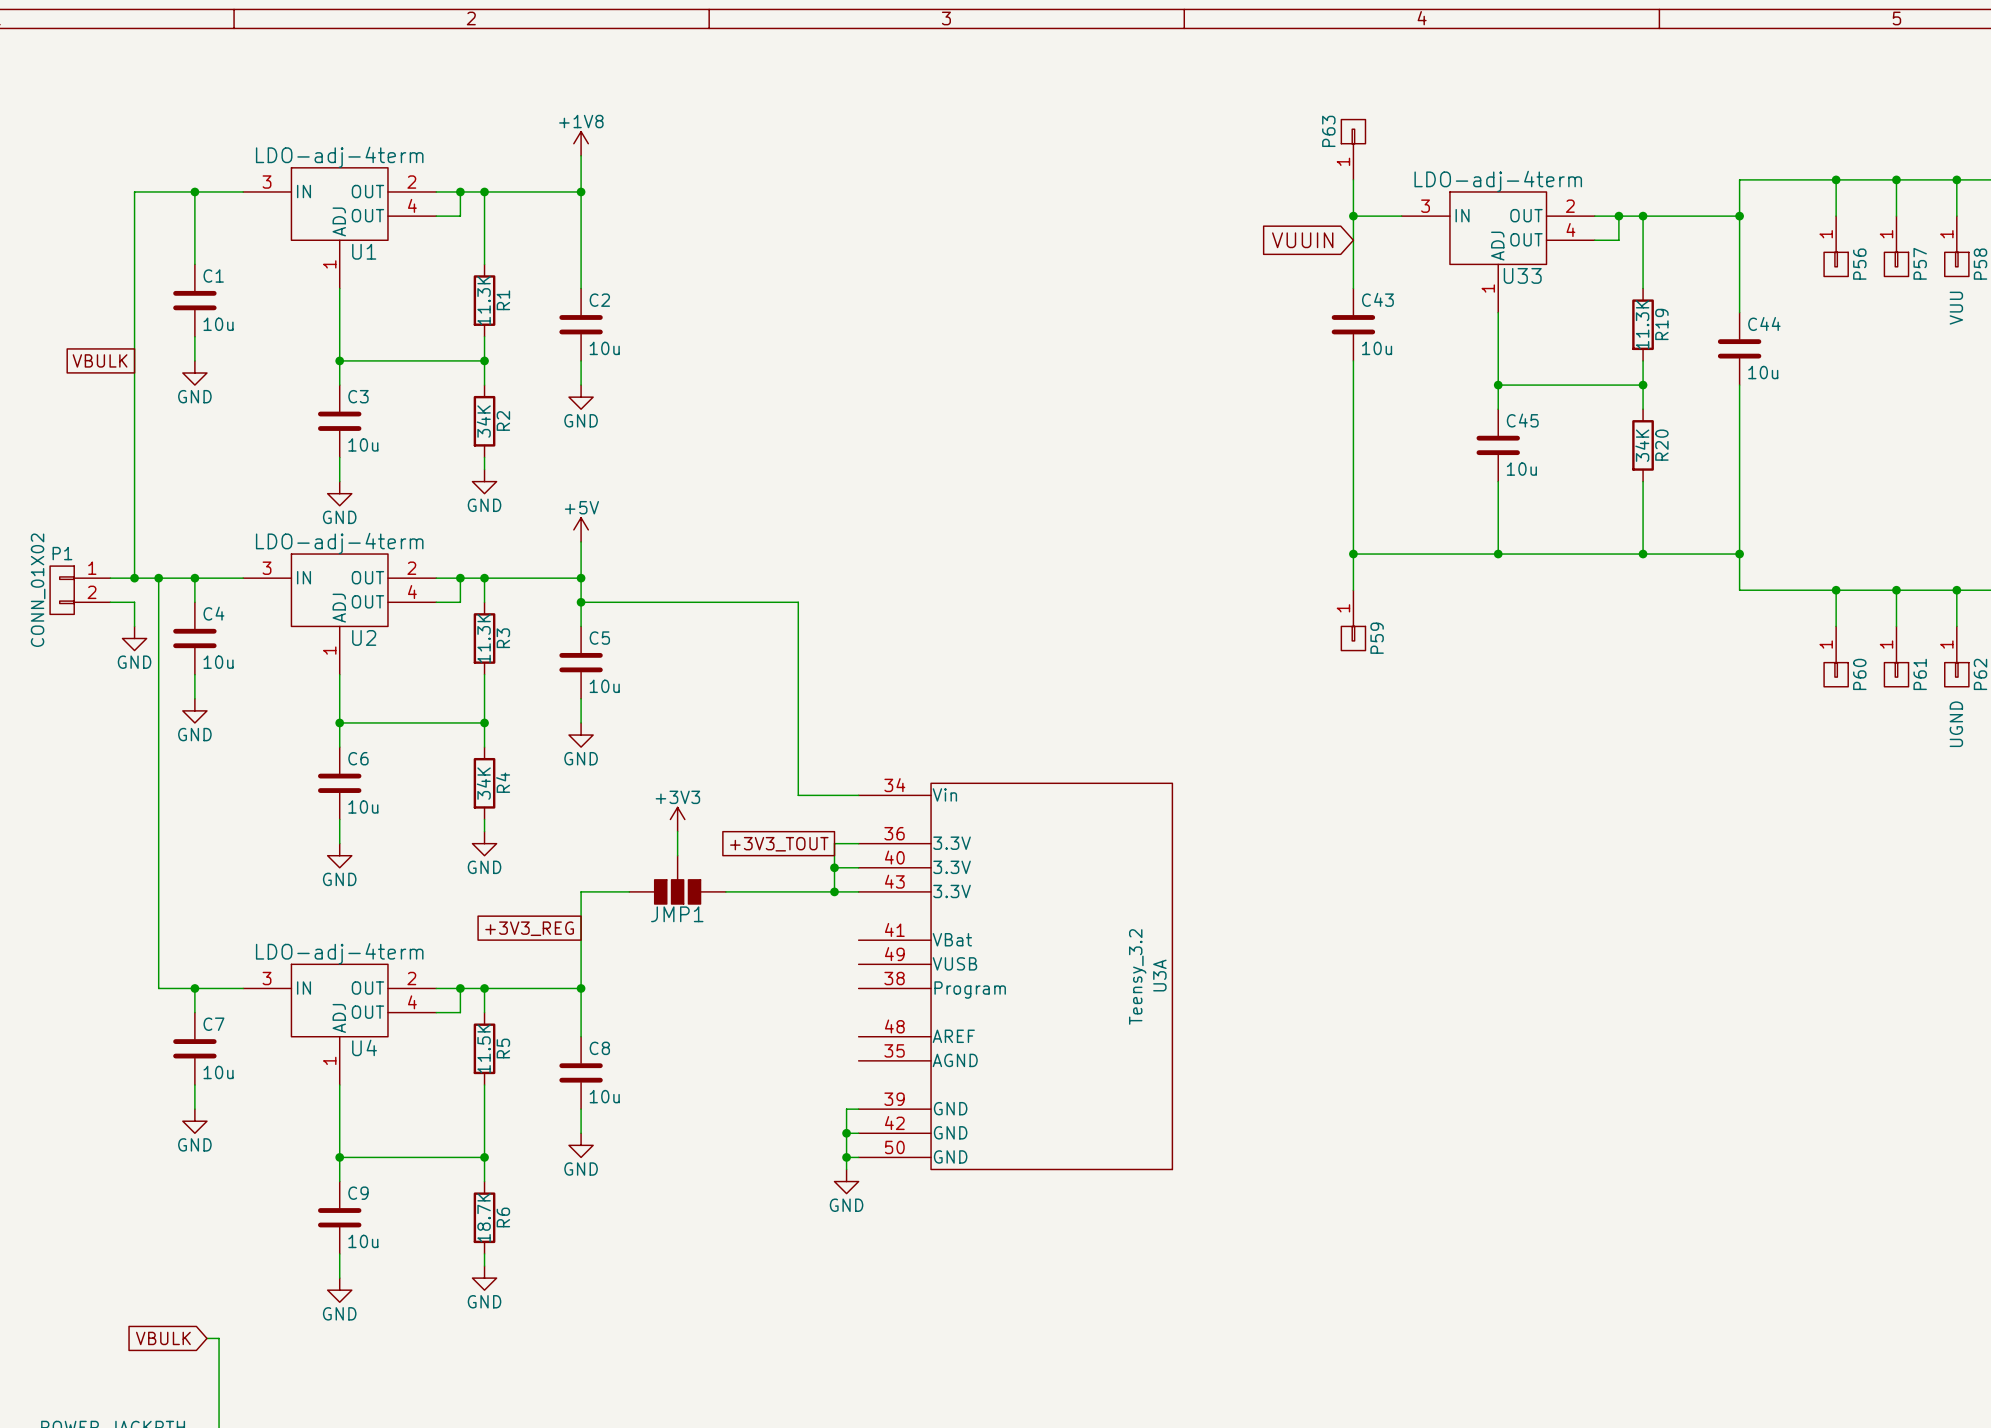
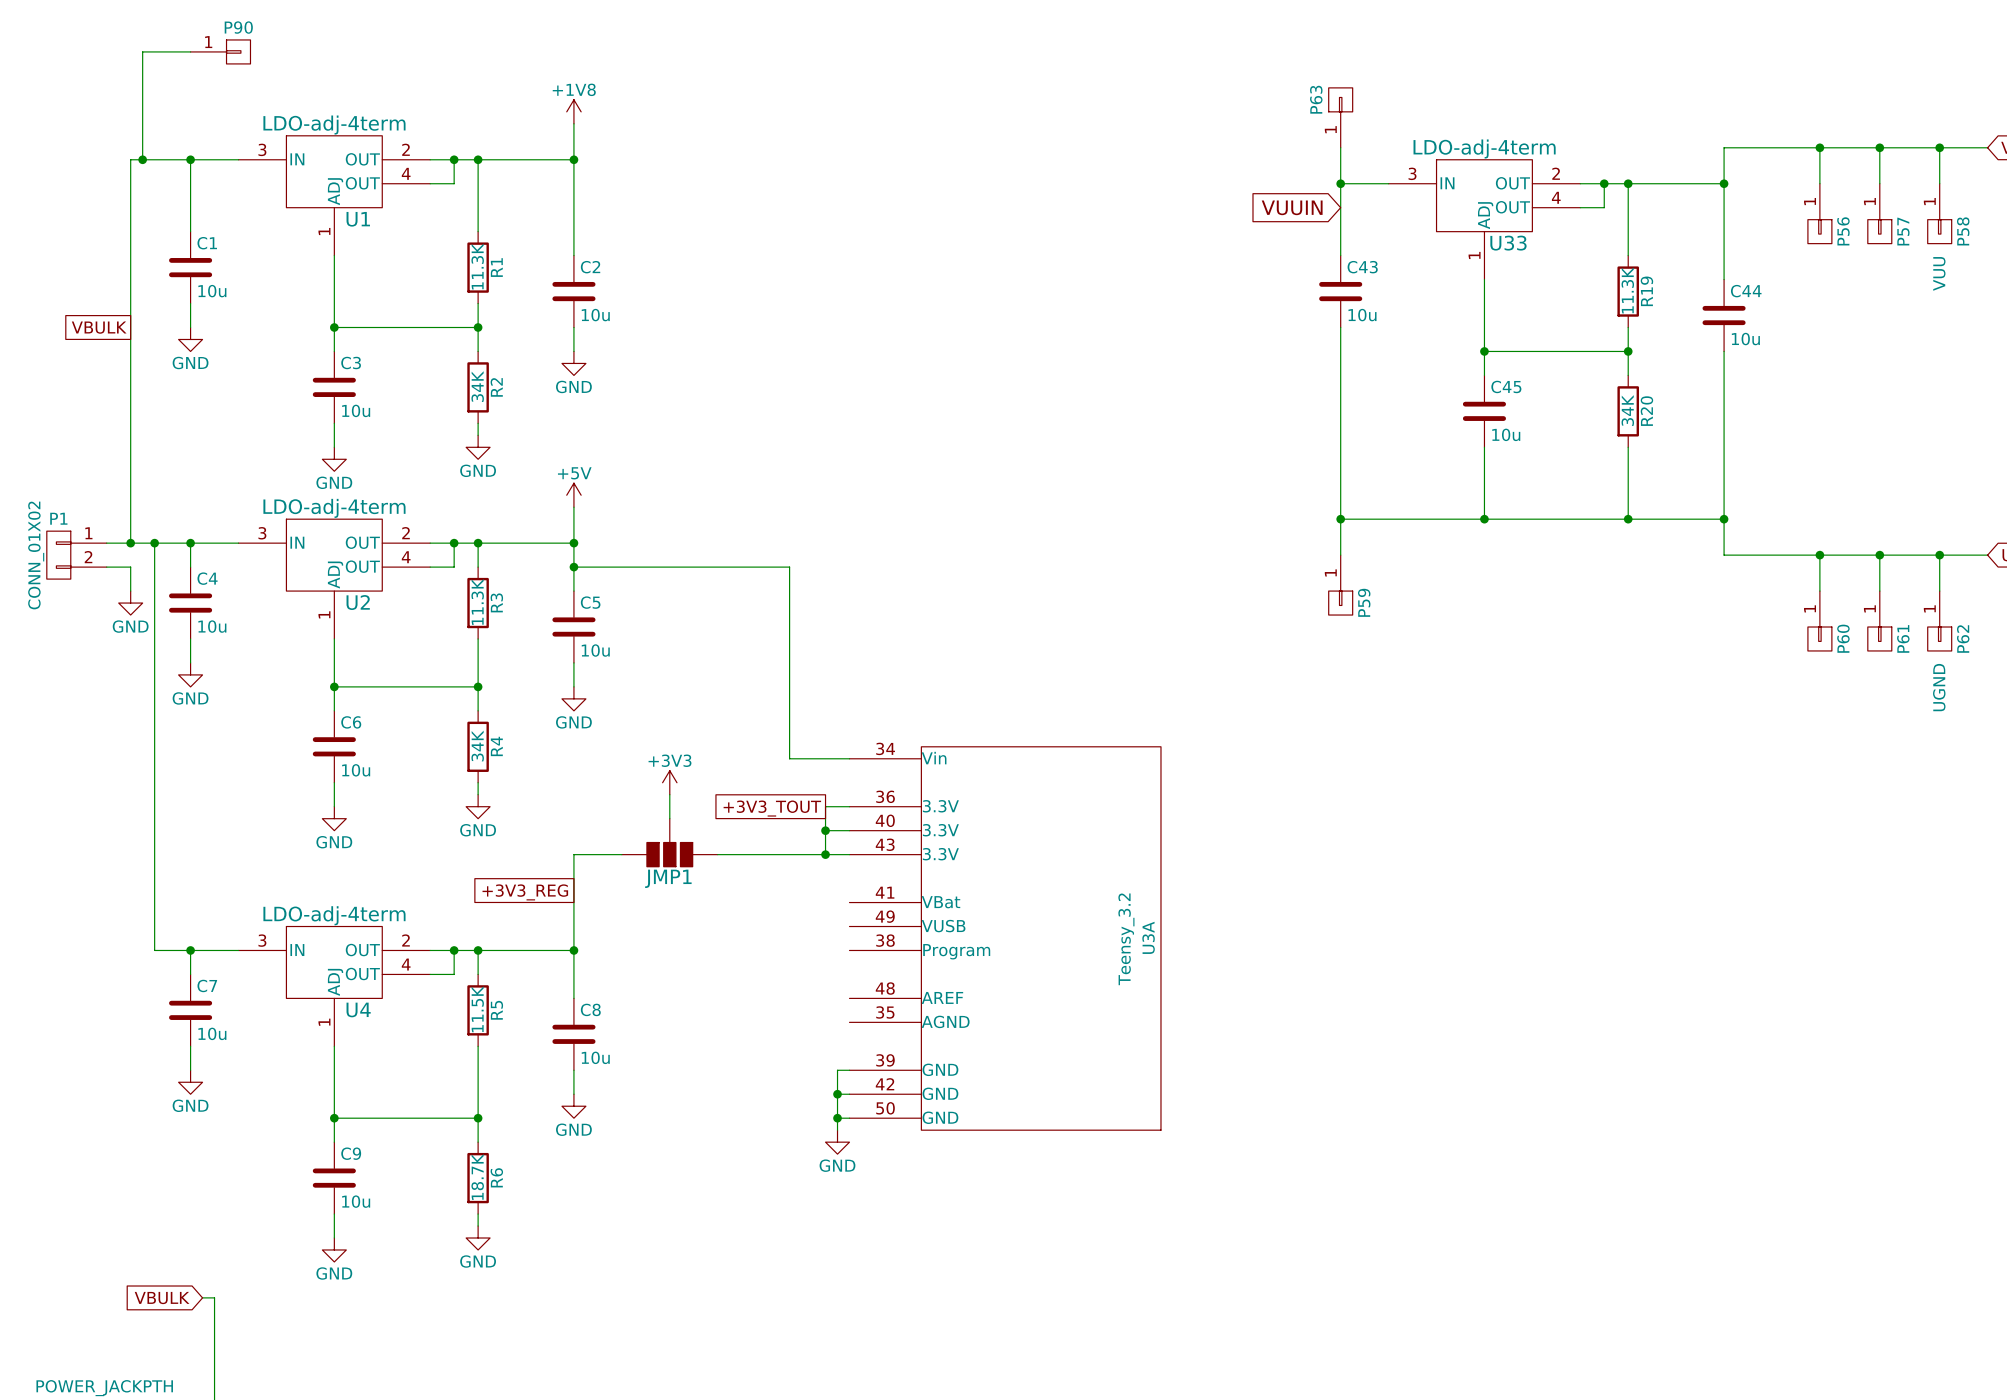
wire: none -> (190, 51) (142, 51) (142, 159)
P90: none -> (220, 51)
junction: none -> (142, 159)

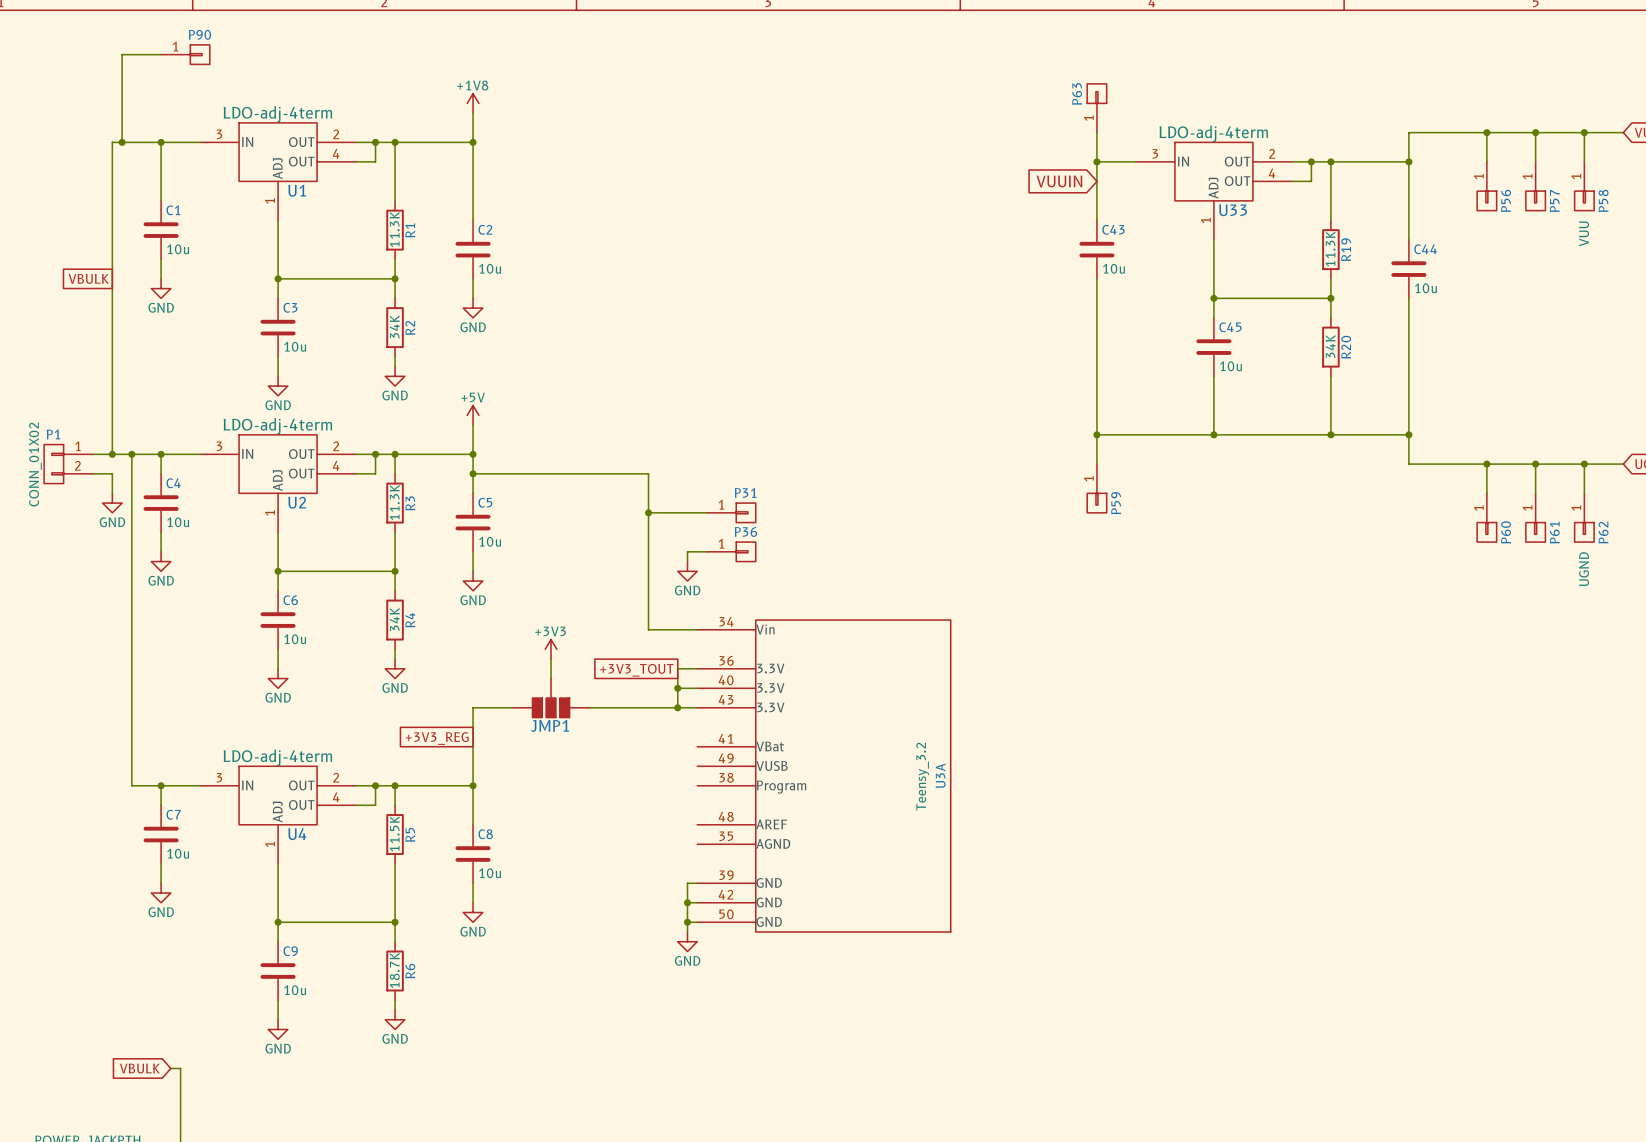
wire: none -> (648, 512) (707, 512)
junction: none -> (648, 512)
P31: none -> (731, 512)
wire: none -> (707, 551) (687, 551) (687, 561)
P36: none -> (731, 551)
power symbol: none -> GND (687, 571)

